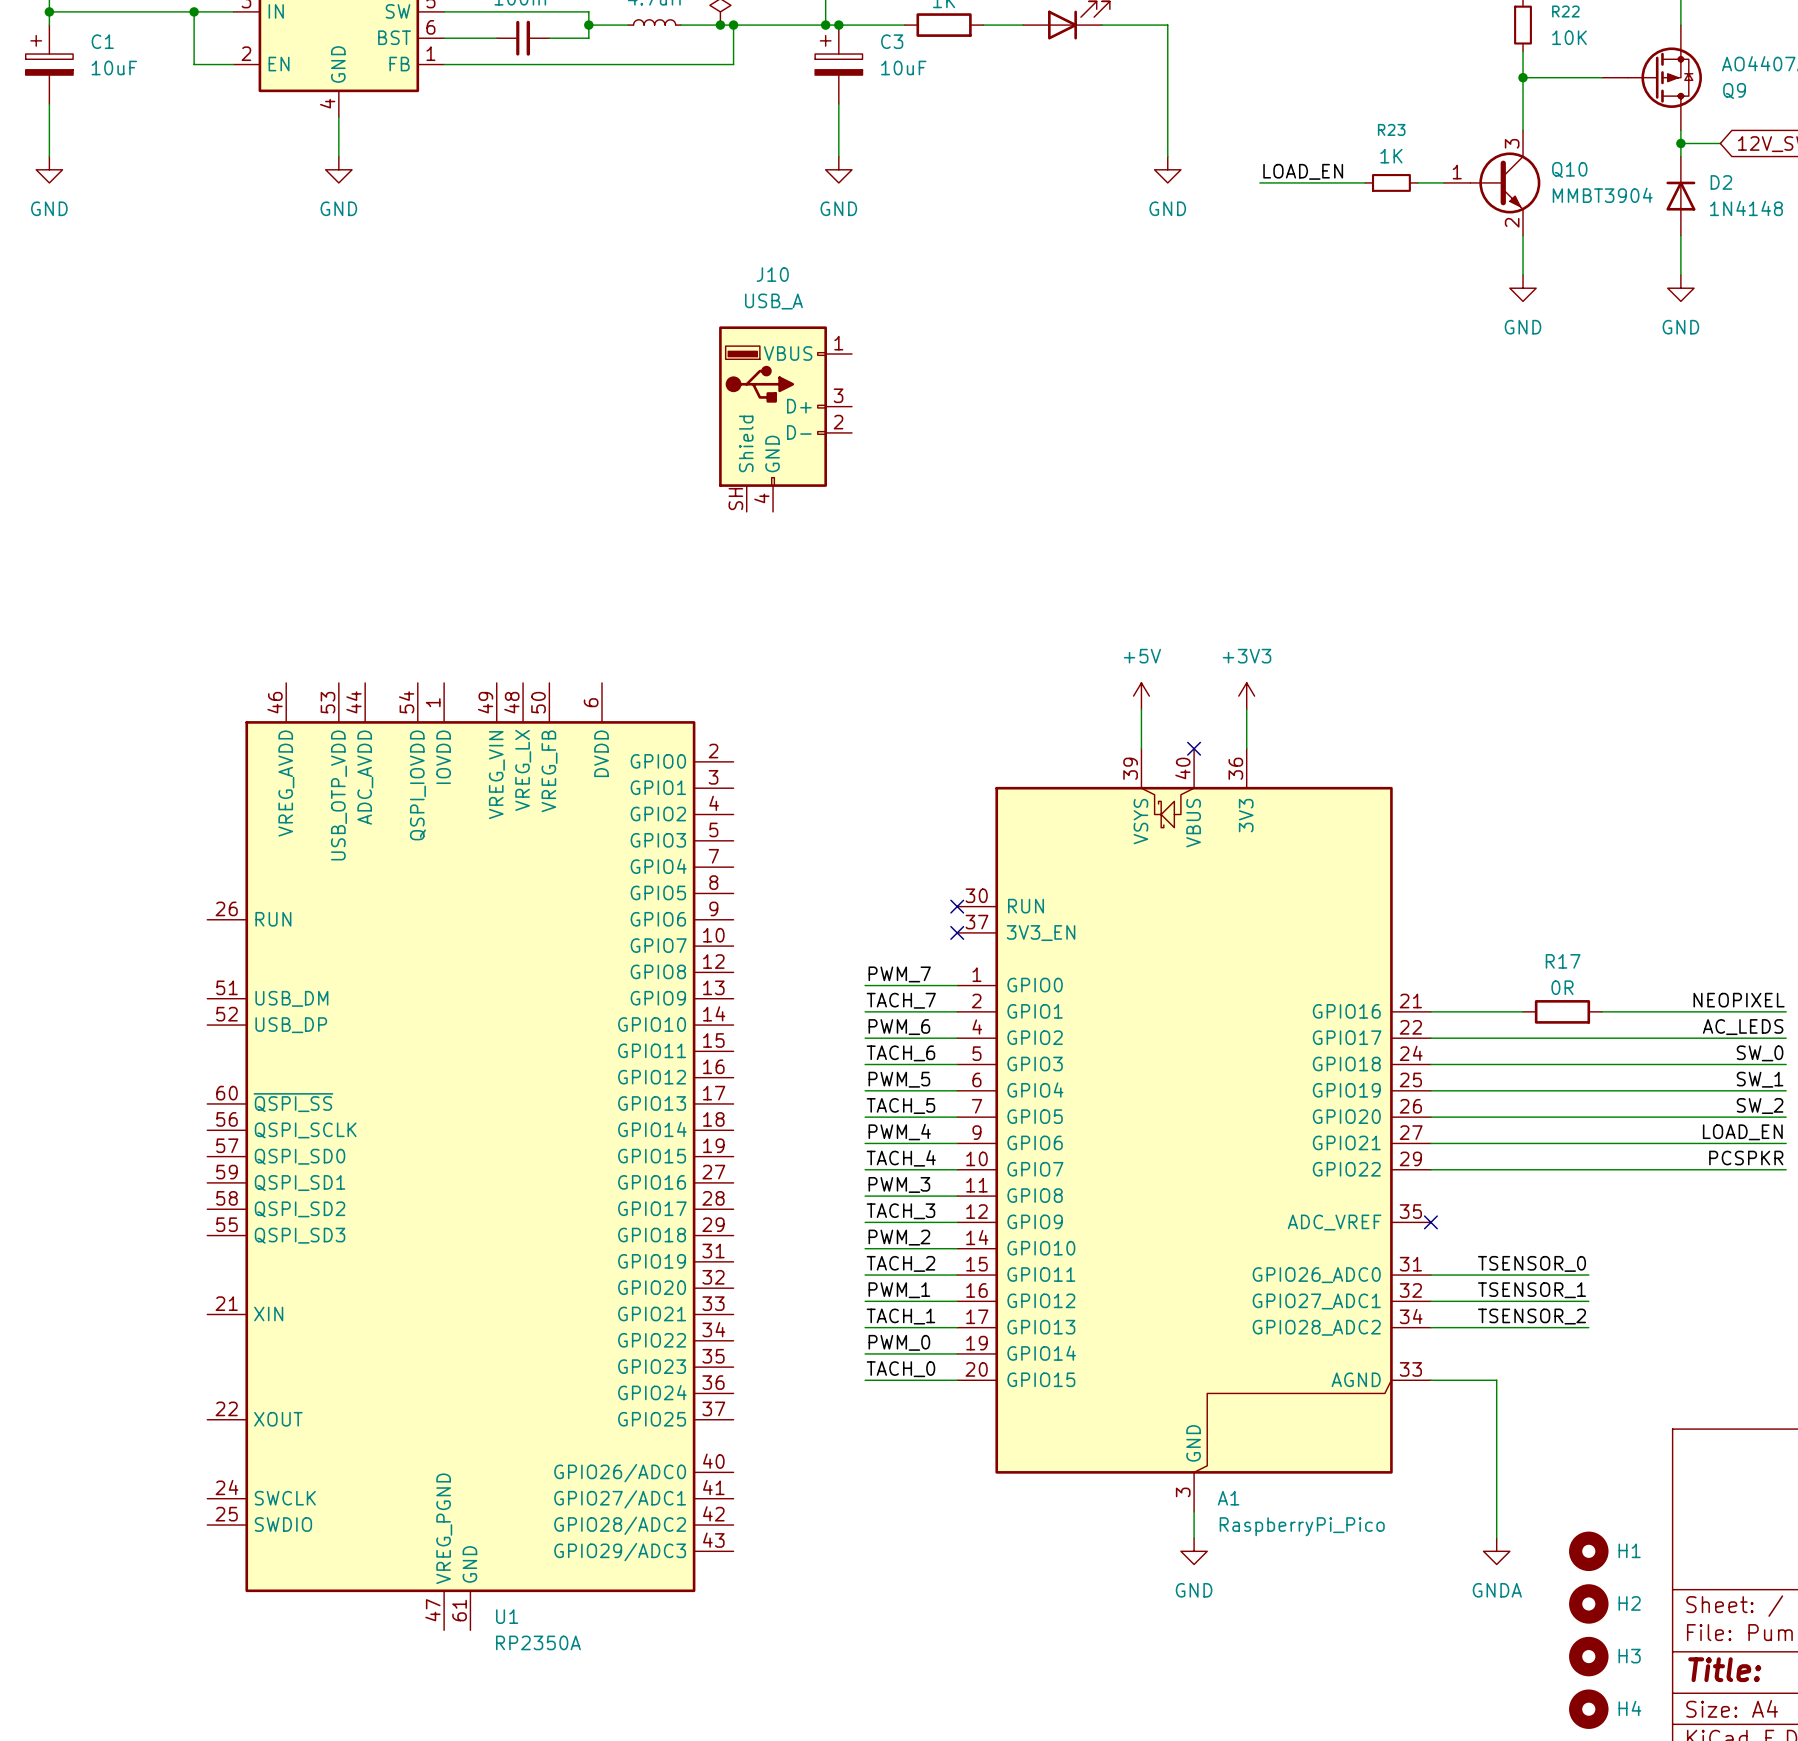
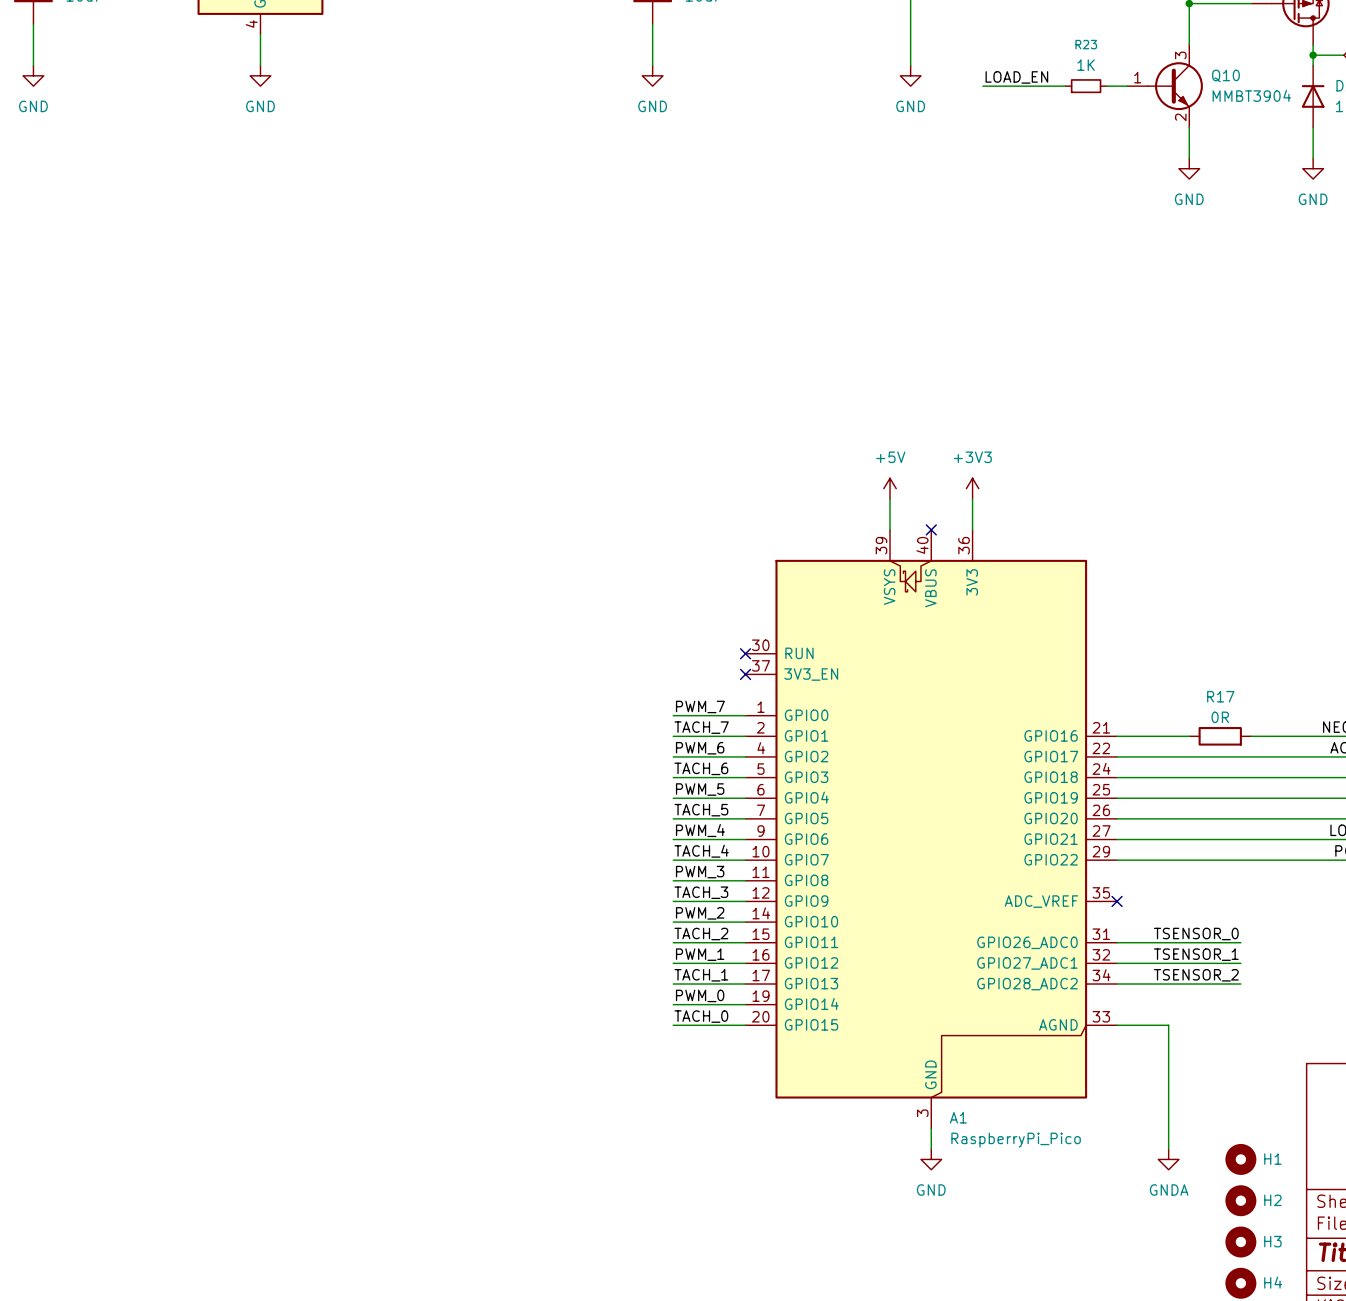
J10: USB_A (785, 419) -> none
U1: RP2350A (470, 1156) -> none

